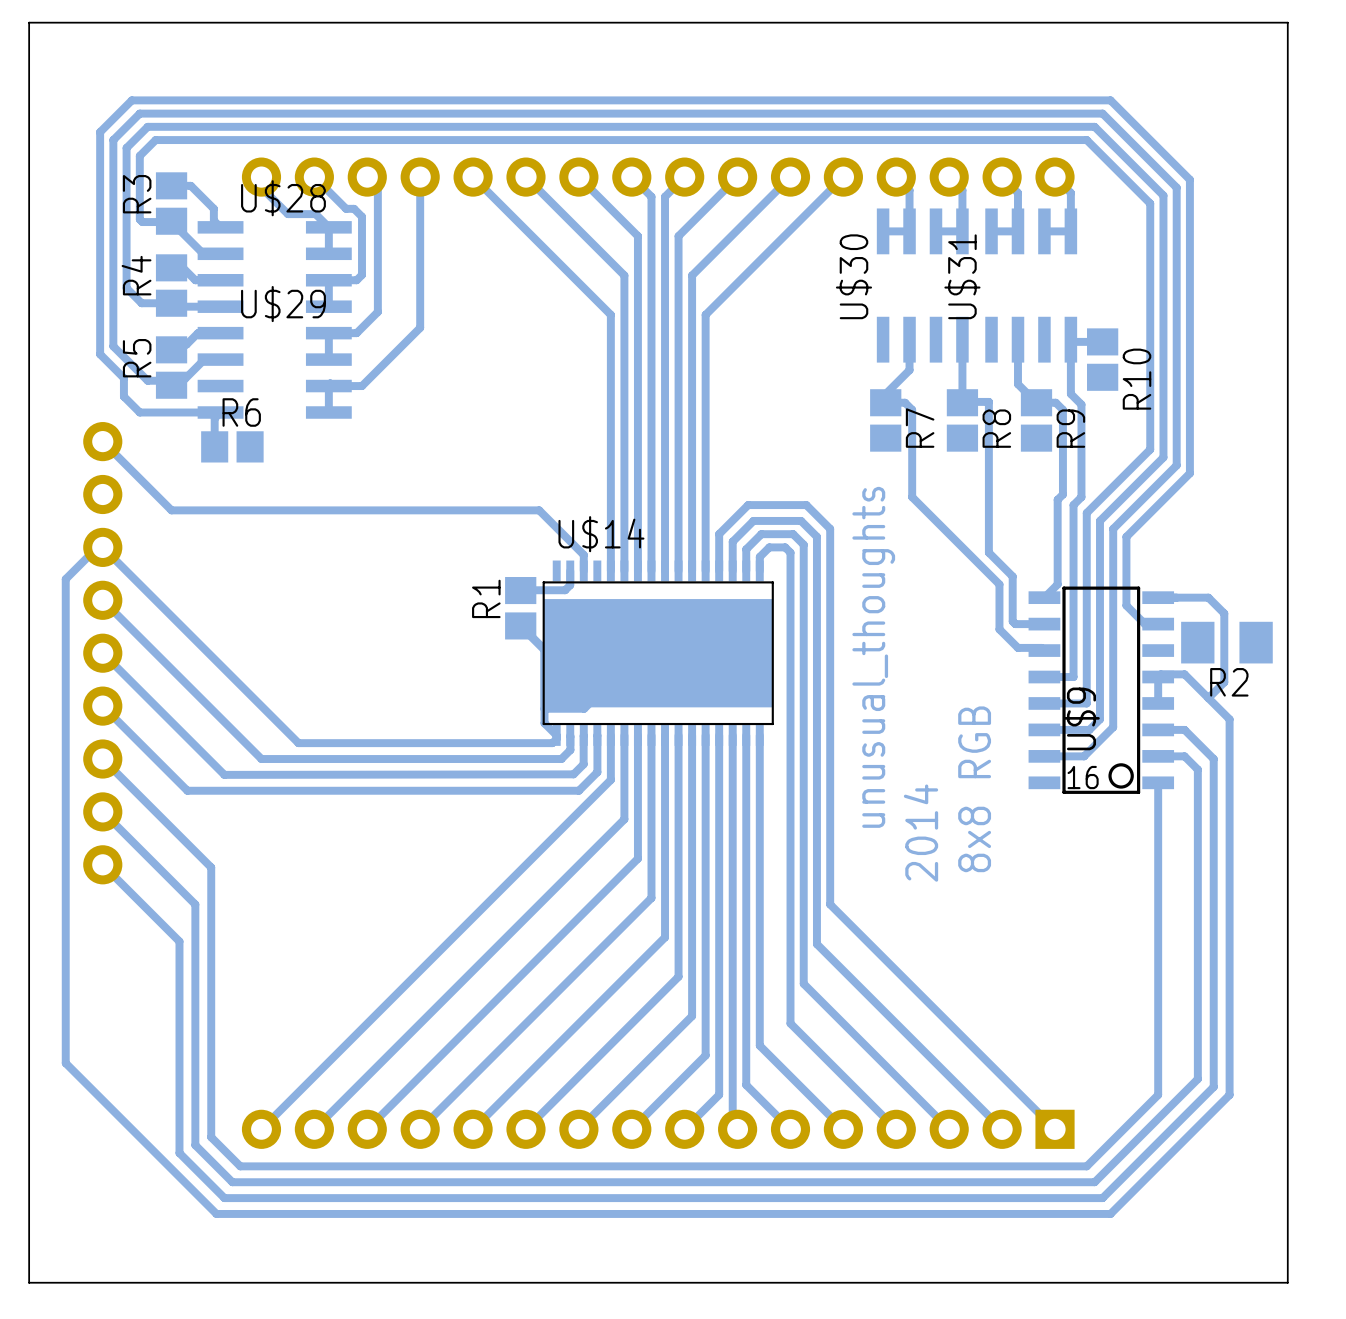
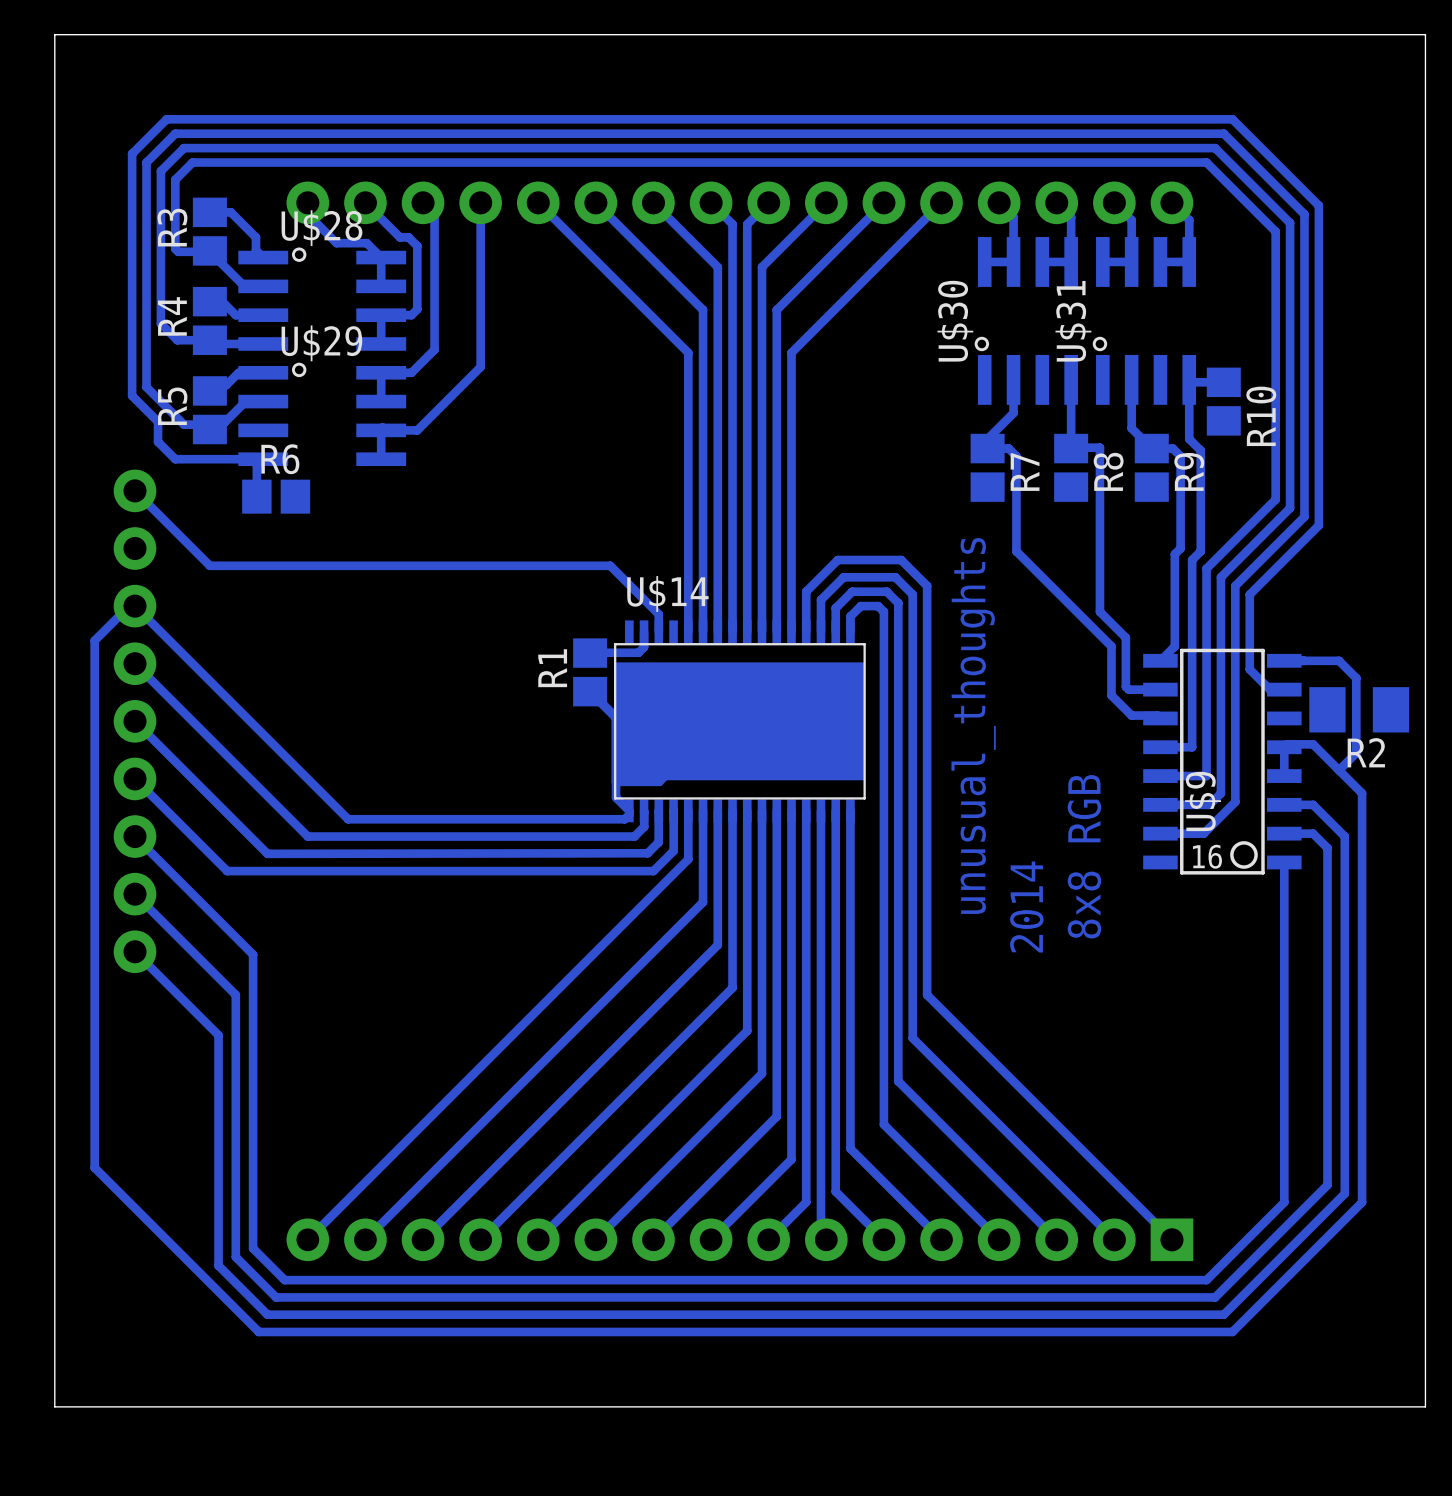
U$30 footprint: [876, 208, 969, 363] -> [974, 237, 1078, 405]
U$31 footprint: [985, 208, 1078, 363] -> [1092, 237, 1197, 405]
U$28 footprint: [197, 221, 352, 313] -> [238, 247, 407, 351]
U$29 footprint: [197, 326, 352, 419] -> [238, 362, 407, 467]

